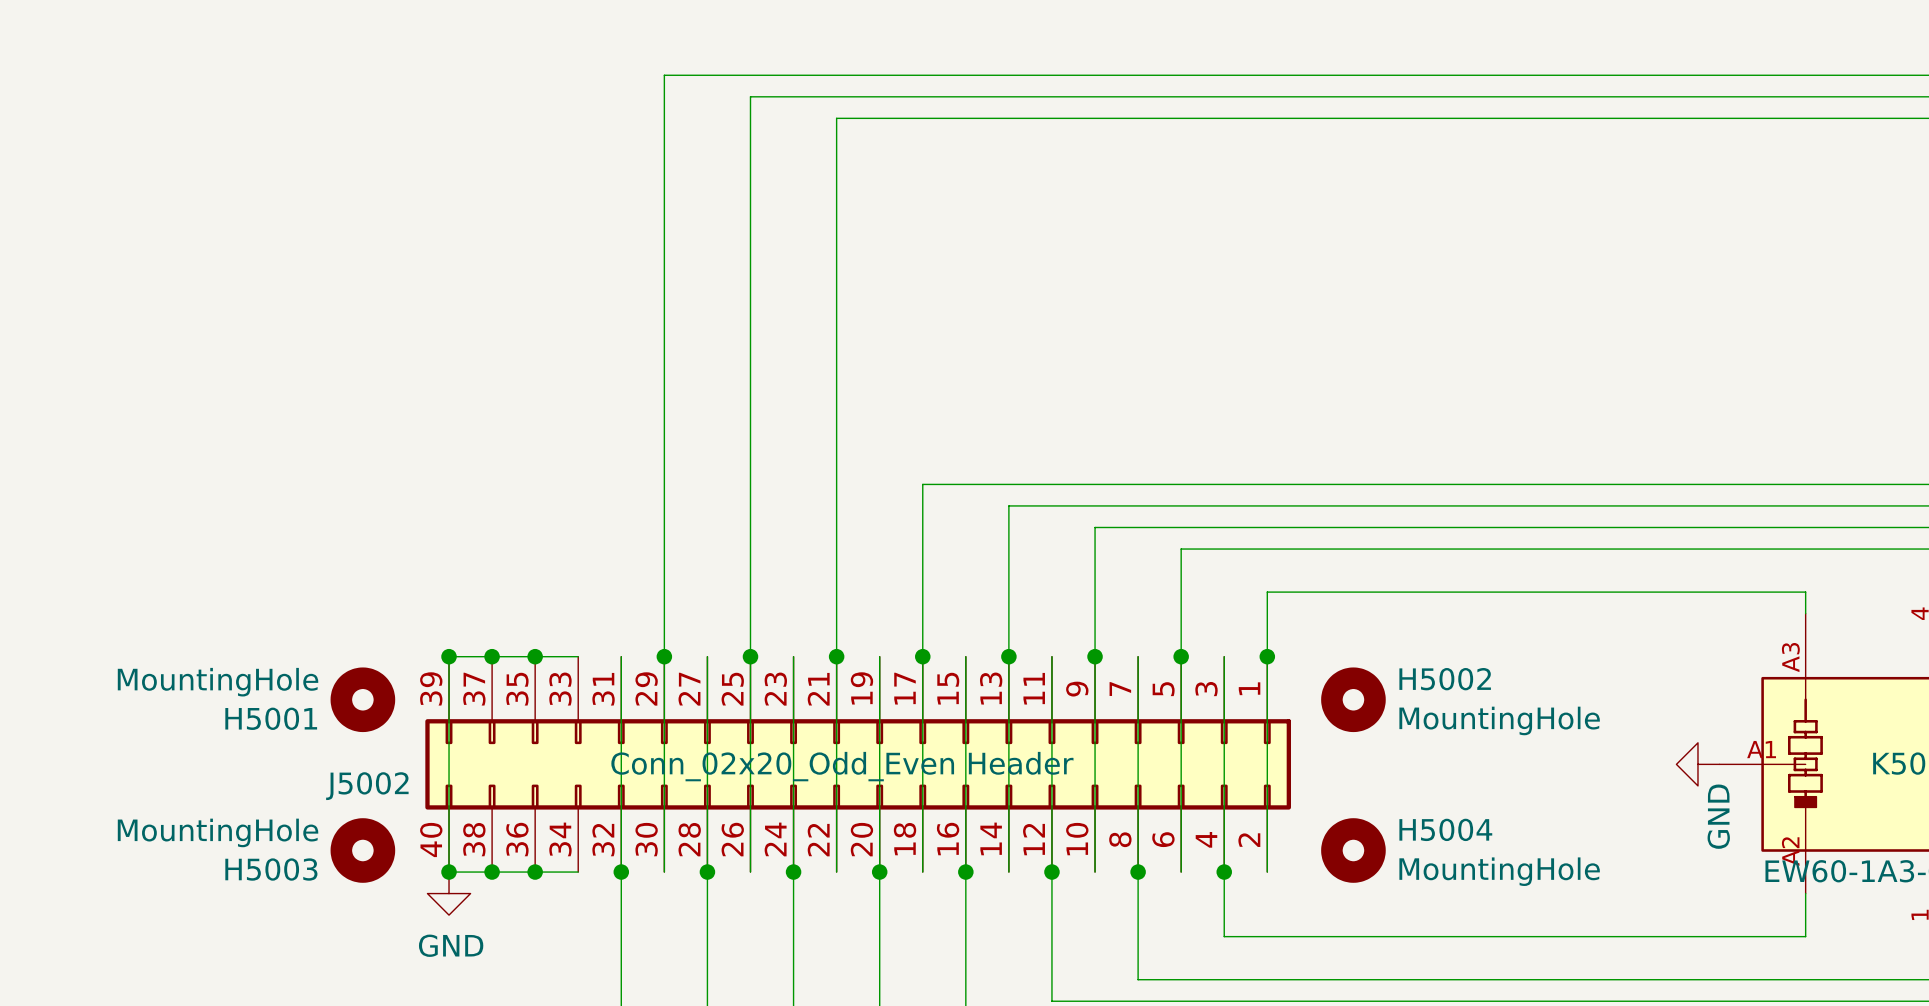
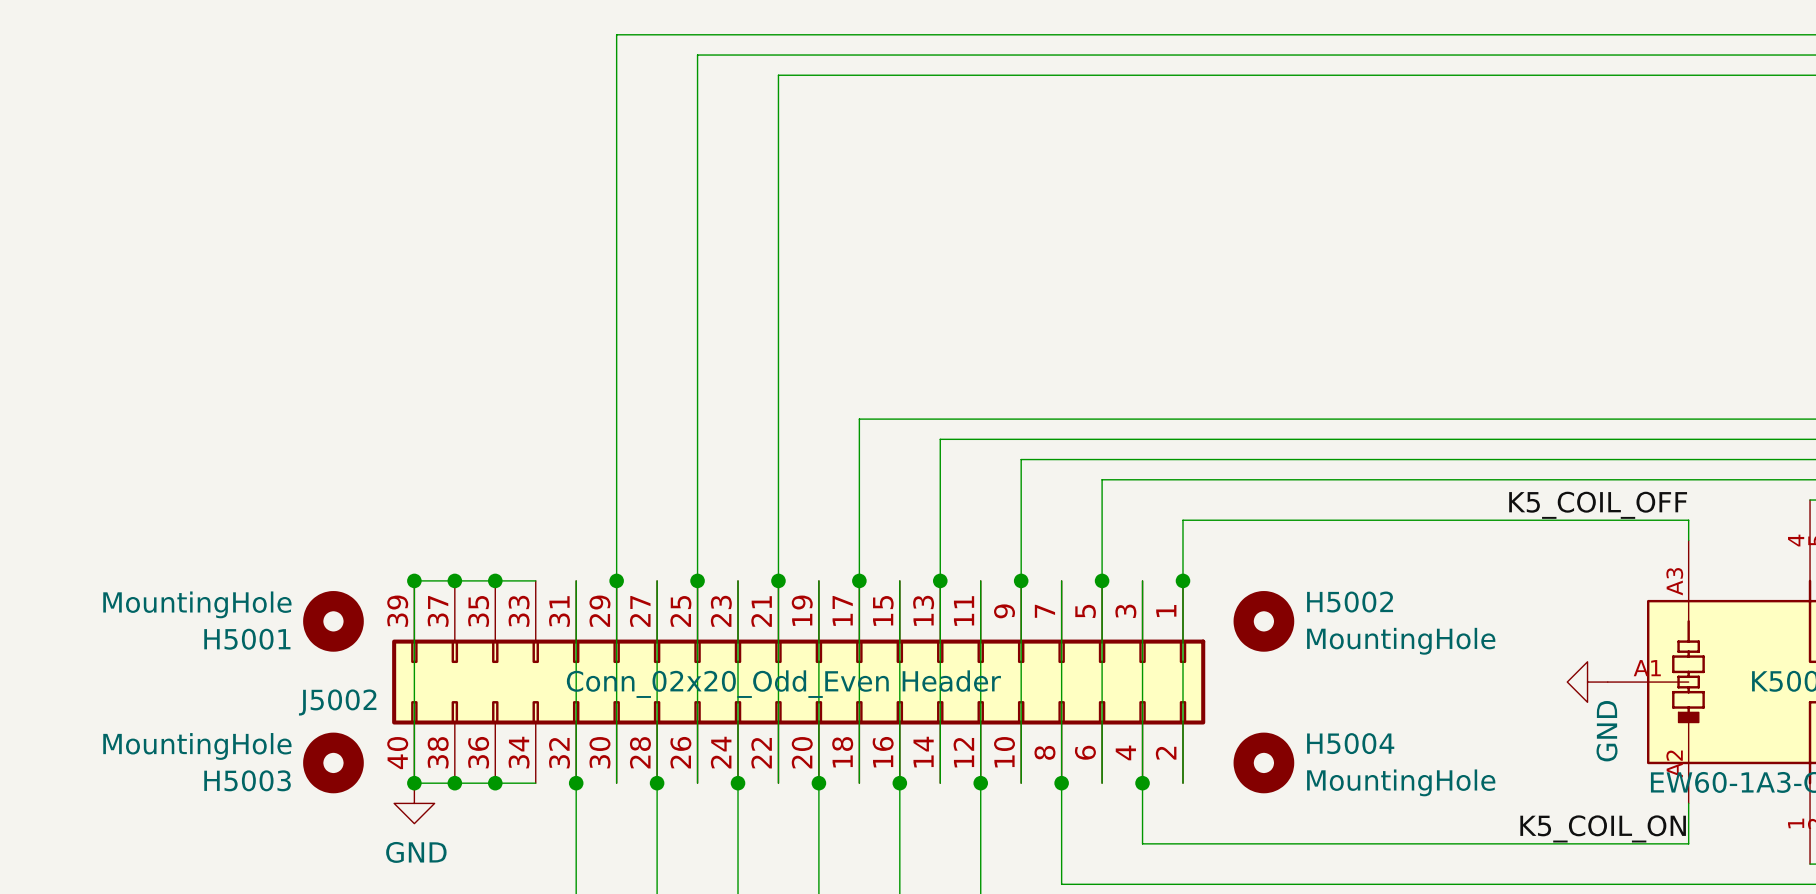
label: none -> K5_COIL_OFF (1598, 505)
label: none -> K5_COIL_ON (1603, 828)

